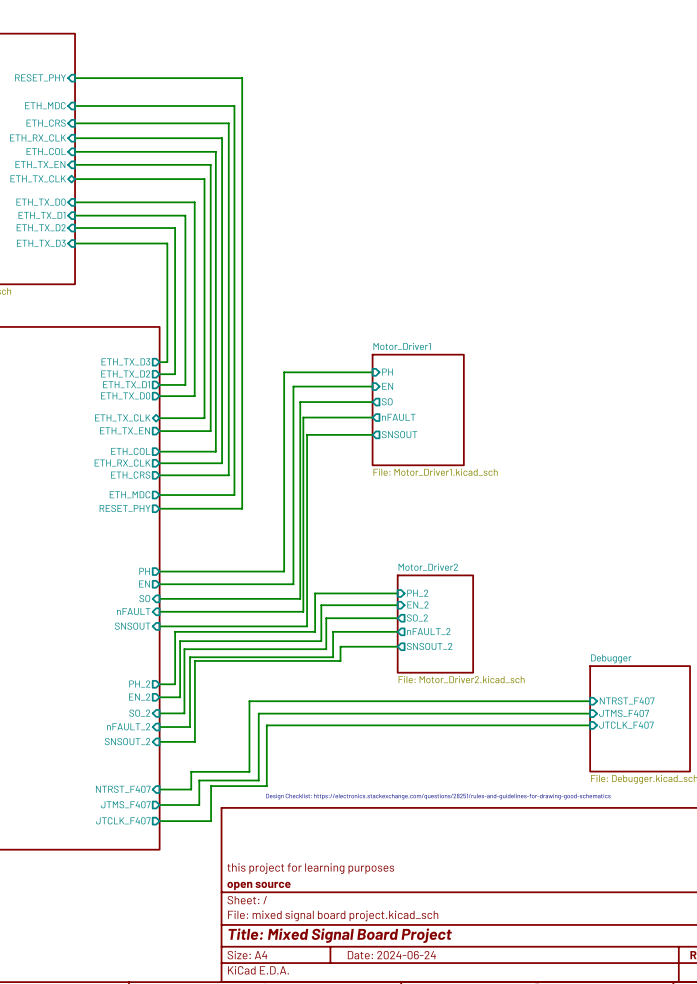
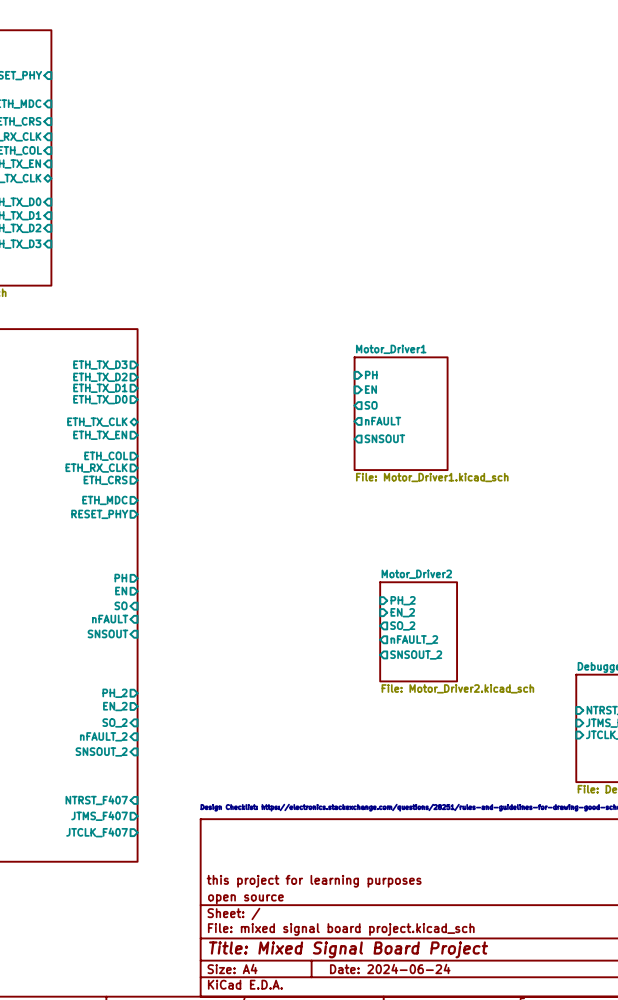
wire: (75, 78) (242, 78) (242, 508) (159, 508) -> none
wire: (75, 106) (234, 106) (234, 495) (159, 495) -> none
wire: (75, 123) (228, 123) (228, 475) (159, 475) -> none
wire: (75, 138) (222, 138) (222, 463) (159, 463) -> none
wire: (75, 151) (215, 151) (215, 451) (159, 451) -> none
wire: (75, 164) (210, 164) (210, 431) (159, 431) -> none
wire: (75, 179) (204, 179) (204, 418) (159, 418) -> none
wire: (75, 202) (194, 202) (194, 396) (159, 396) -> none
wire: (75, 215) (185, 215) (185, 384) (159, 384) -> none
wire: (75, 228) (175, 228) (175, 374) (159, 374) -> none
wire: (75, 243) (167, 243) (167, 362) (159, 362) -> none
wire: (372, 372) (284, 372) (284, 571) (159, 571) -> none
wire: (372, 386) (293, 386) (293, 584) (159, 584) -> none
wire: (372, 402) (300, 402) (300, 598) (159, 598) -> none
wire: (372, 417) (303, 417) (303, 611) (159, 611) -> none
wire: (372, 434) (307, 434) (307, 626) (159, 626) -> none
wire: (397, 593) (315, 593) (315, 631) (175, 631) (175, 684) (159, 684) -> none
wire: (397, 605) (321, 605) (321, 641) (180, 641) (180, 697) (159, 697) -> none
wire: (397, 618) (326, 618) (326, 649) (184, 649) (184, 713) (159, 713) -> none
wire: (397, 631) (333, 631) (333, 657) (190, 657) (190, 727) (159, 727) -> none
wire: (397, 646) (340, 646) (340, 660) (194, 660) (194, 741) (159, 741) -> none
wire: (590, 701) (249, 701) (249, 771) (191, 771) (191, 789) (159, 789) -> none
wire: (590, 713) (258, 713) (258, 780) (199, 780) (199, 805) (159, 805) -> none
wire: (590, 725) (266, 725) (266, 786) (211, 786) (211, 821) (159, 821) -> none

